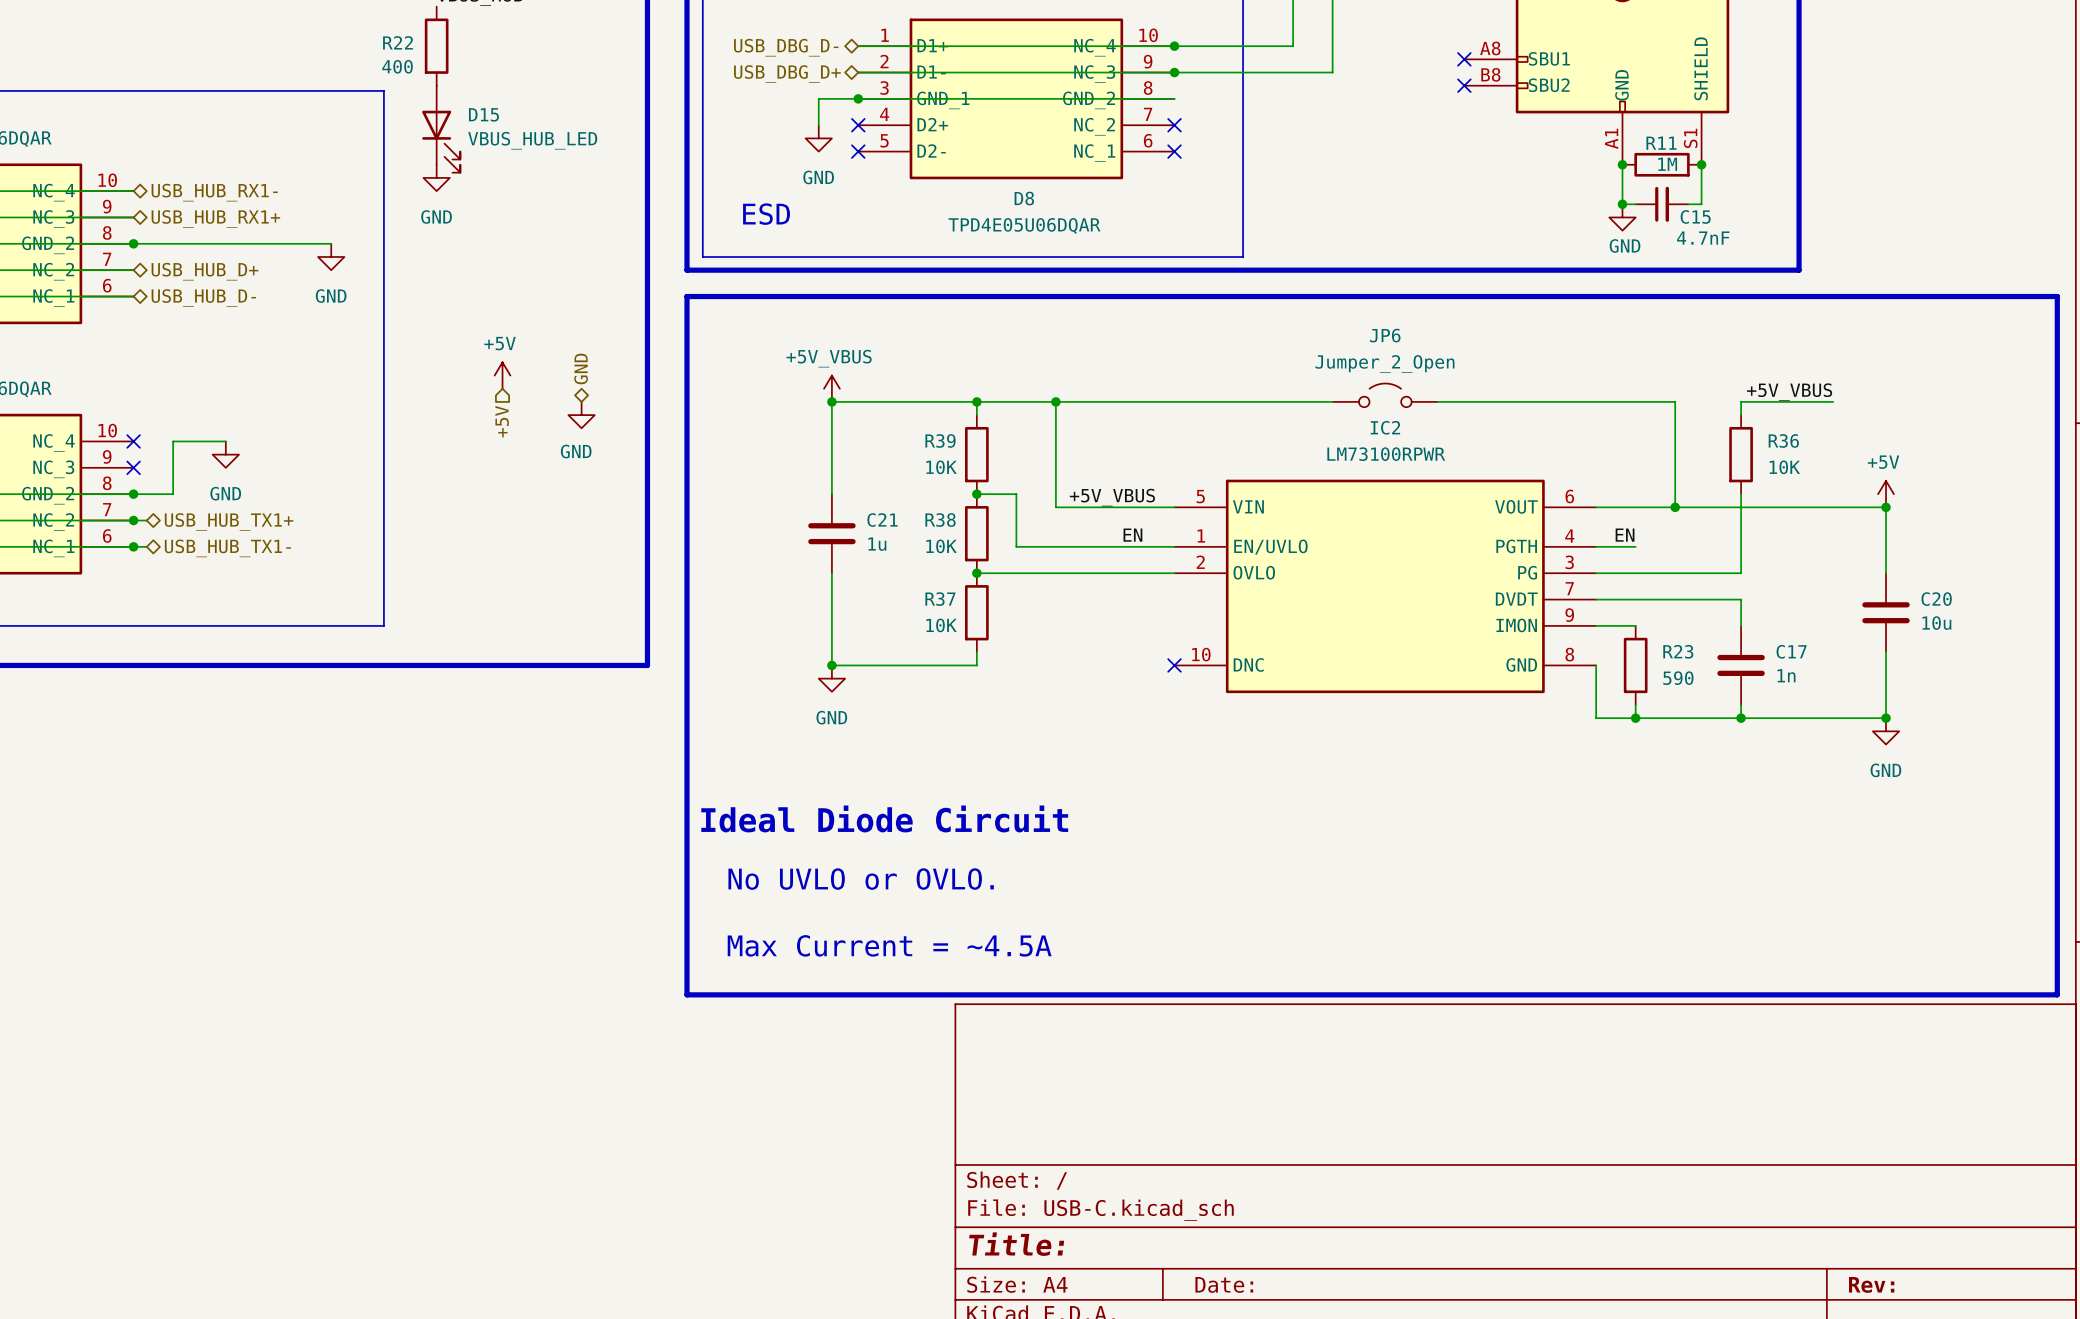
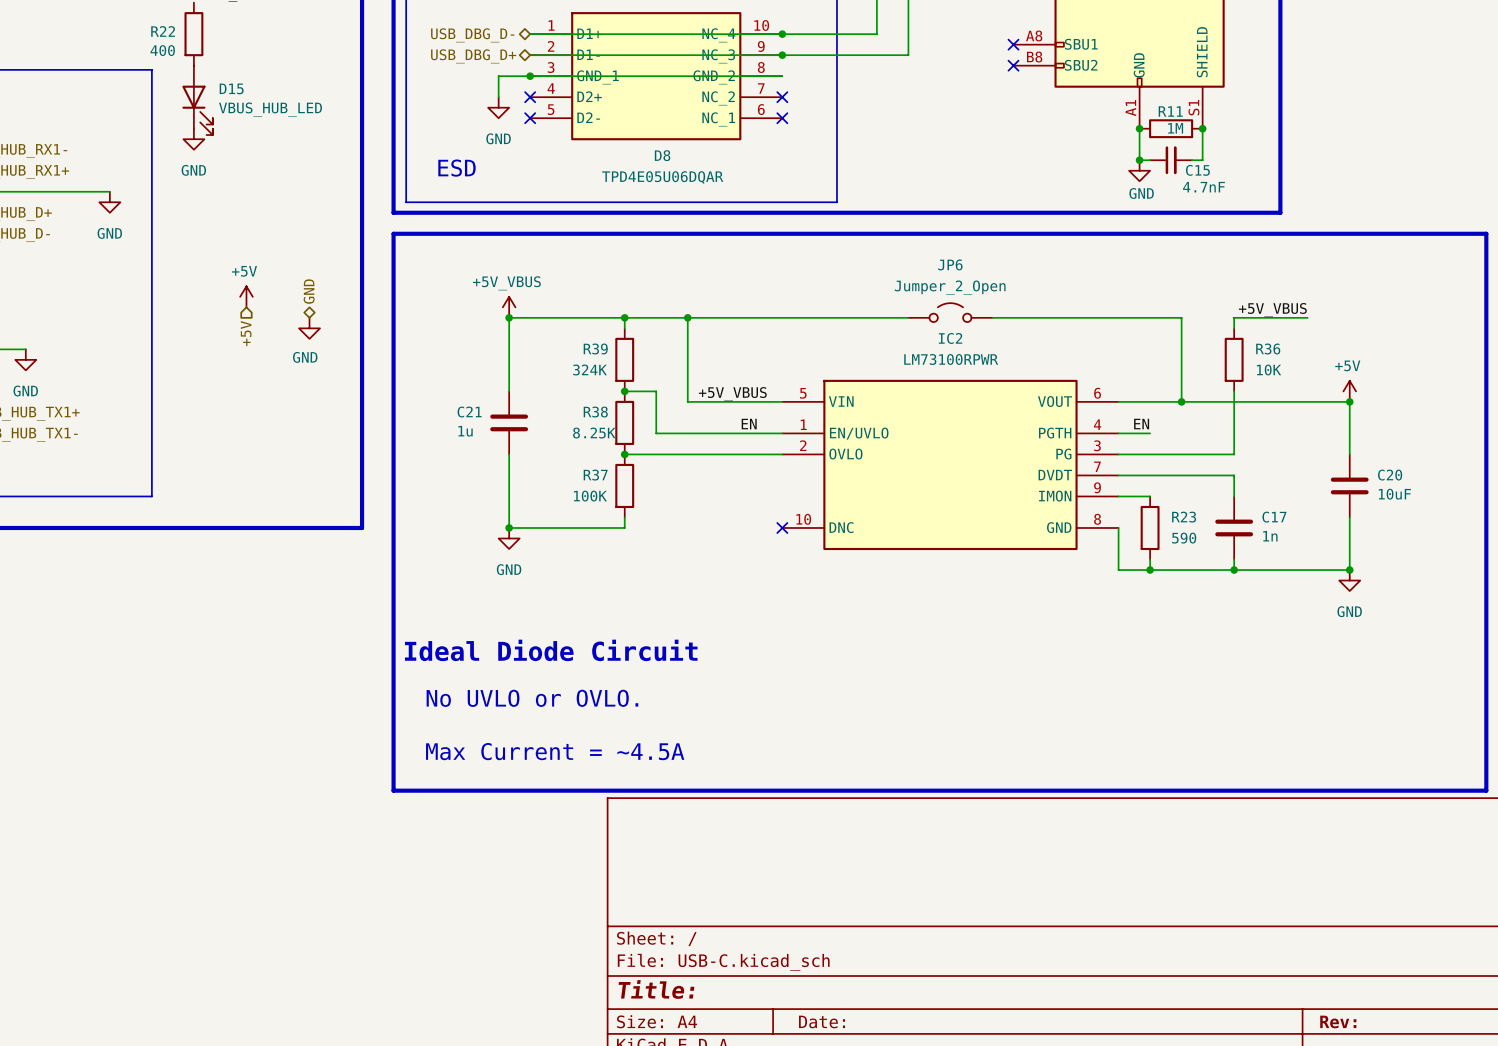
R39 value: 10K (941, 467) -> 324K (590, 369)
C21 name position: C21 (882, 520) -> C21 (469, 412)
C21 value position: 1u (877, 544) -> 1u (465, 431)
R38 value: 10K (941, 546) -> 8.25K (594, 433)
C20 value: 10u (1936, 623) -> 10uF (1394, 494)
R37 value: 10K (941, 625) -> 100K (590, 496)

